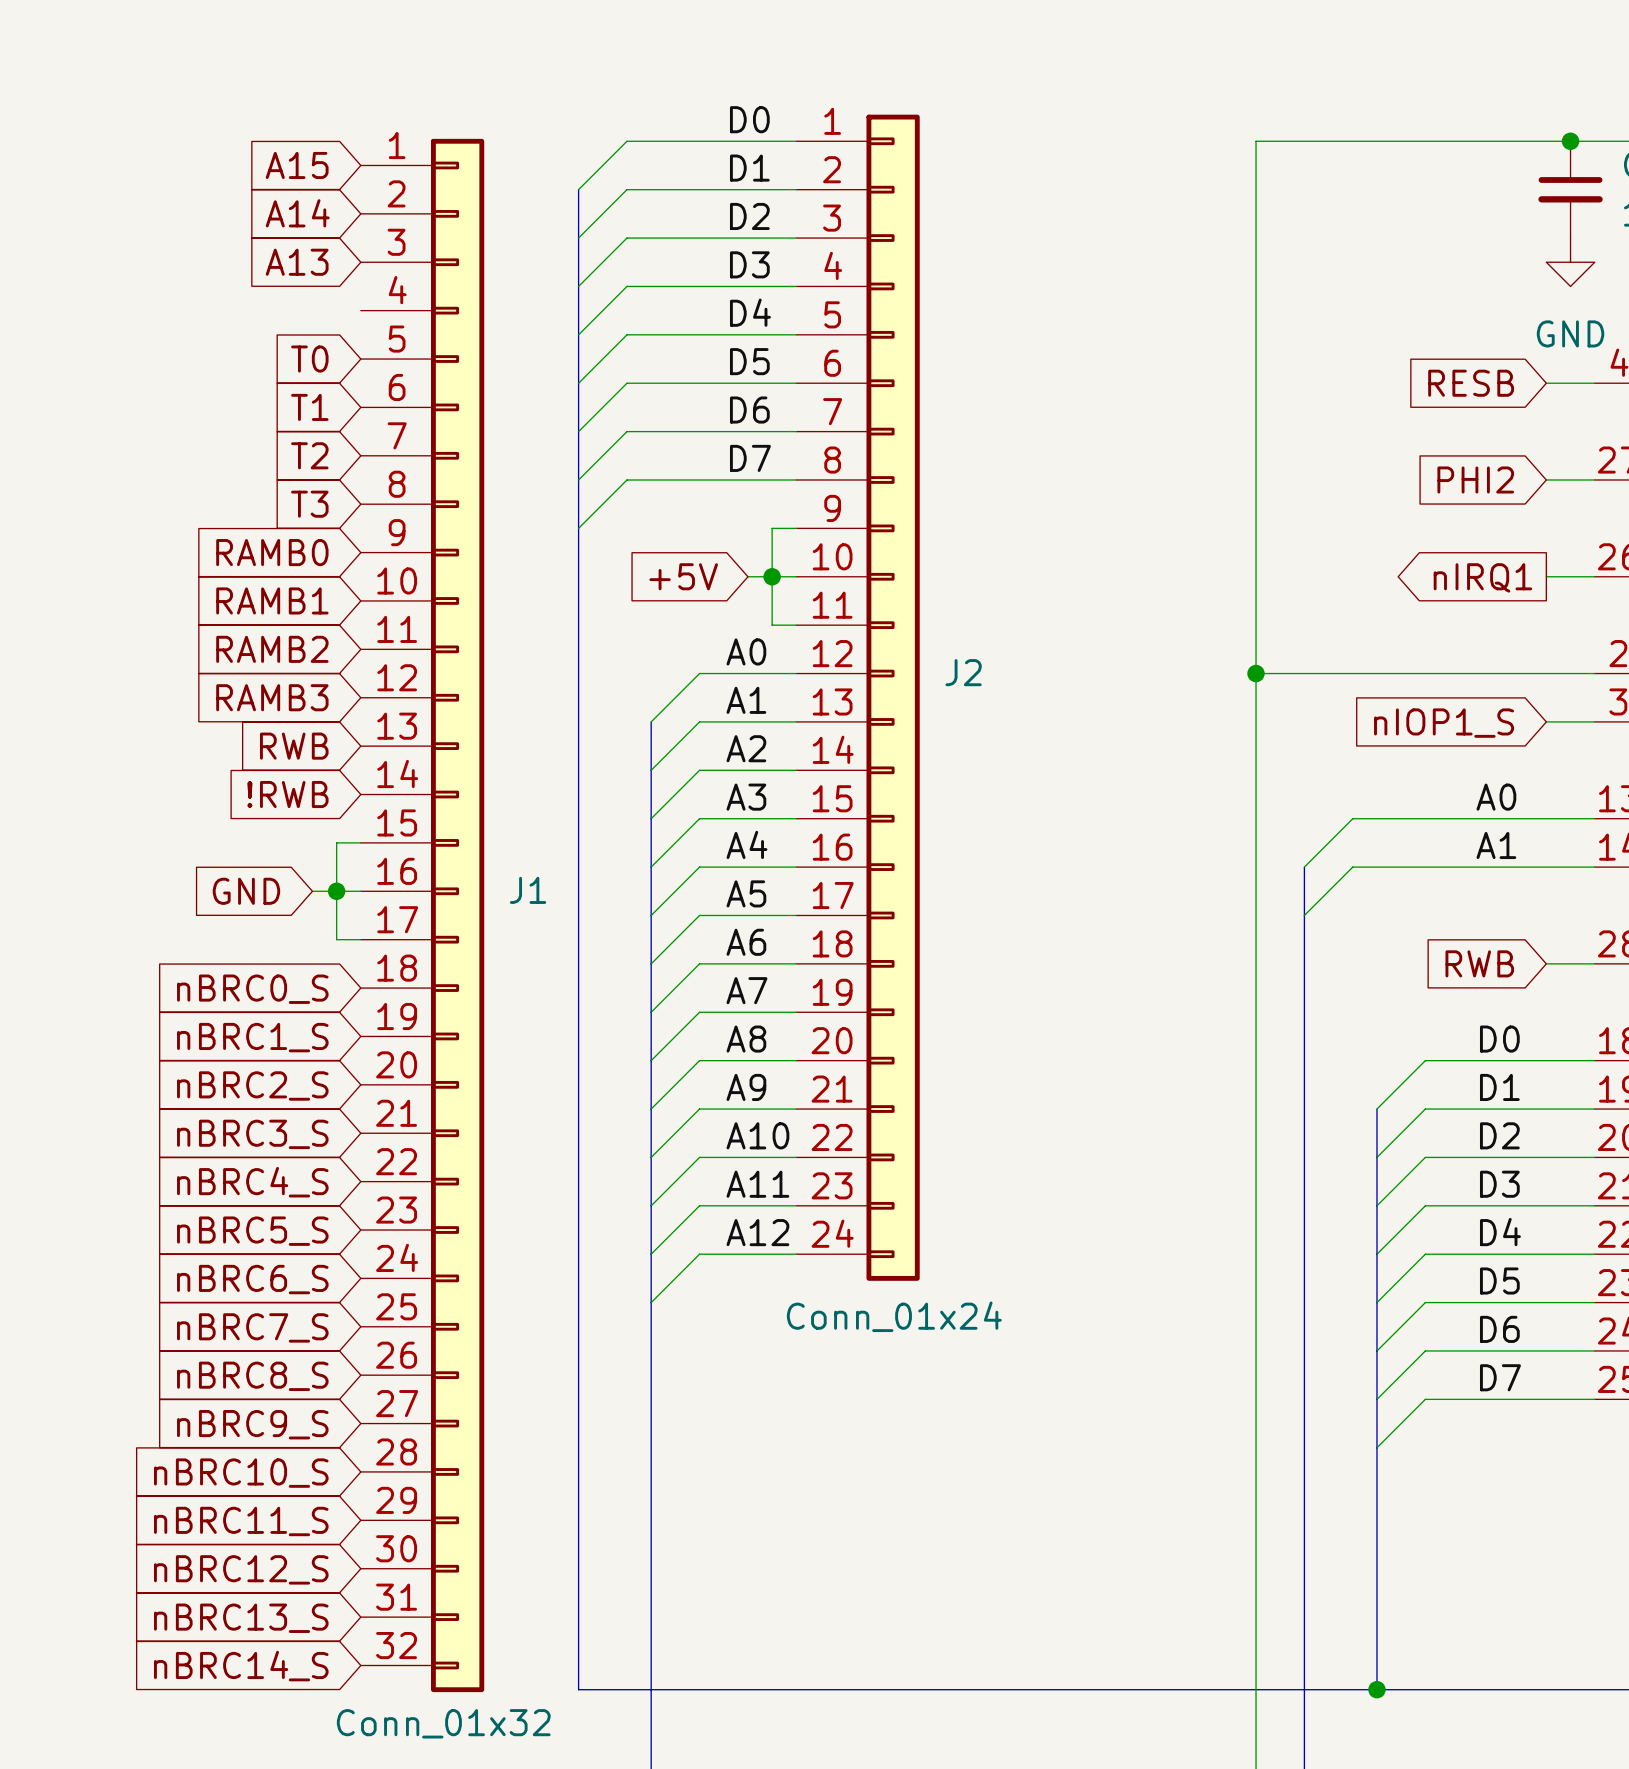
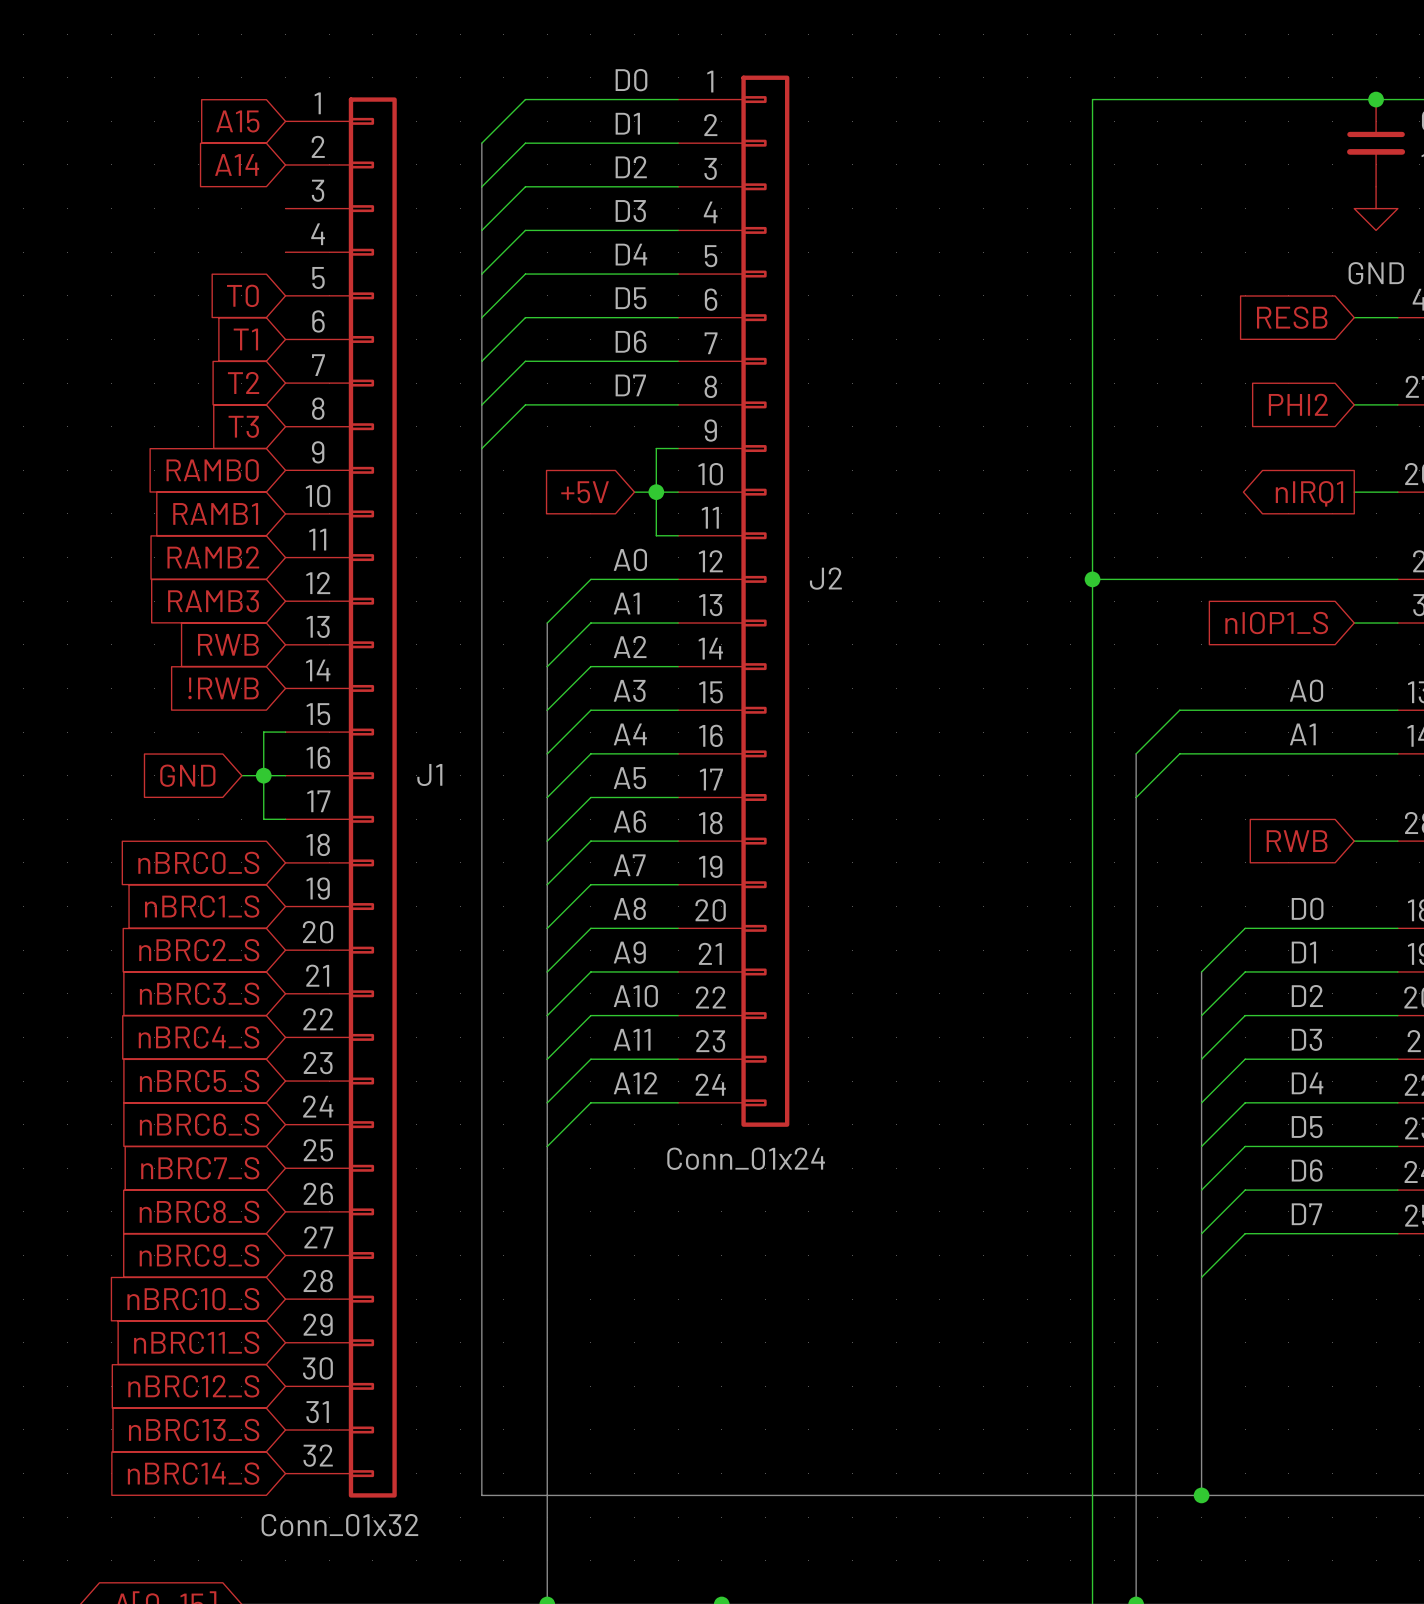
global label: A13 (297, 262) -> none

